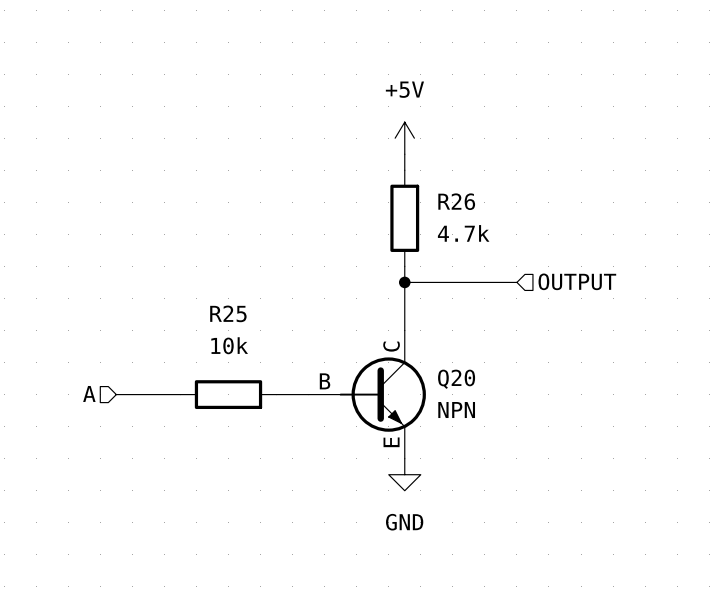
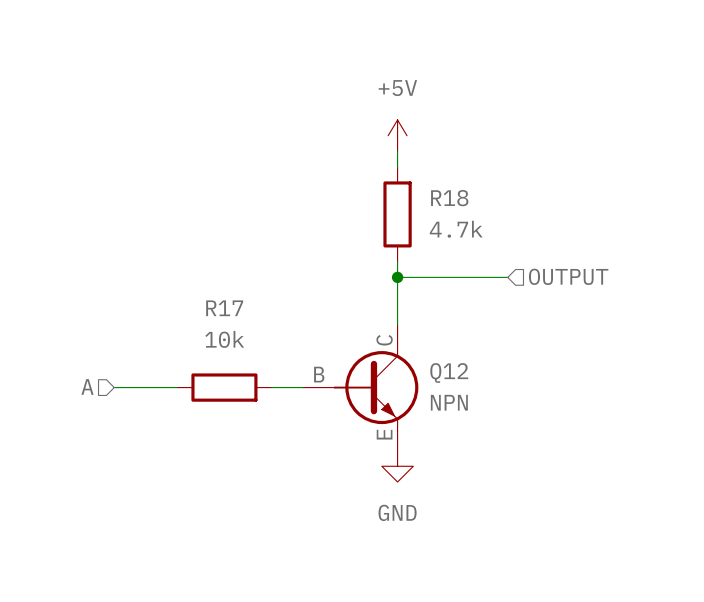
R26 name: R26 (456, 201) -> R18 (449, 198)
R25 name: R25 (228, 313) -> R17 (224, 308)
Q20 name: Q20 (456, 379) -> Q12 (449, 372)

